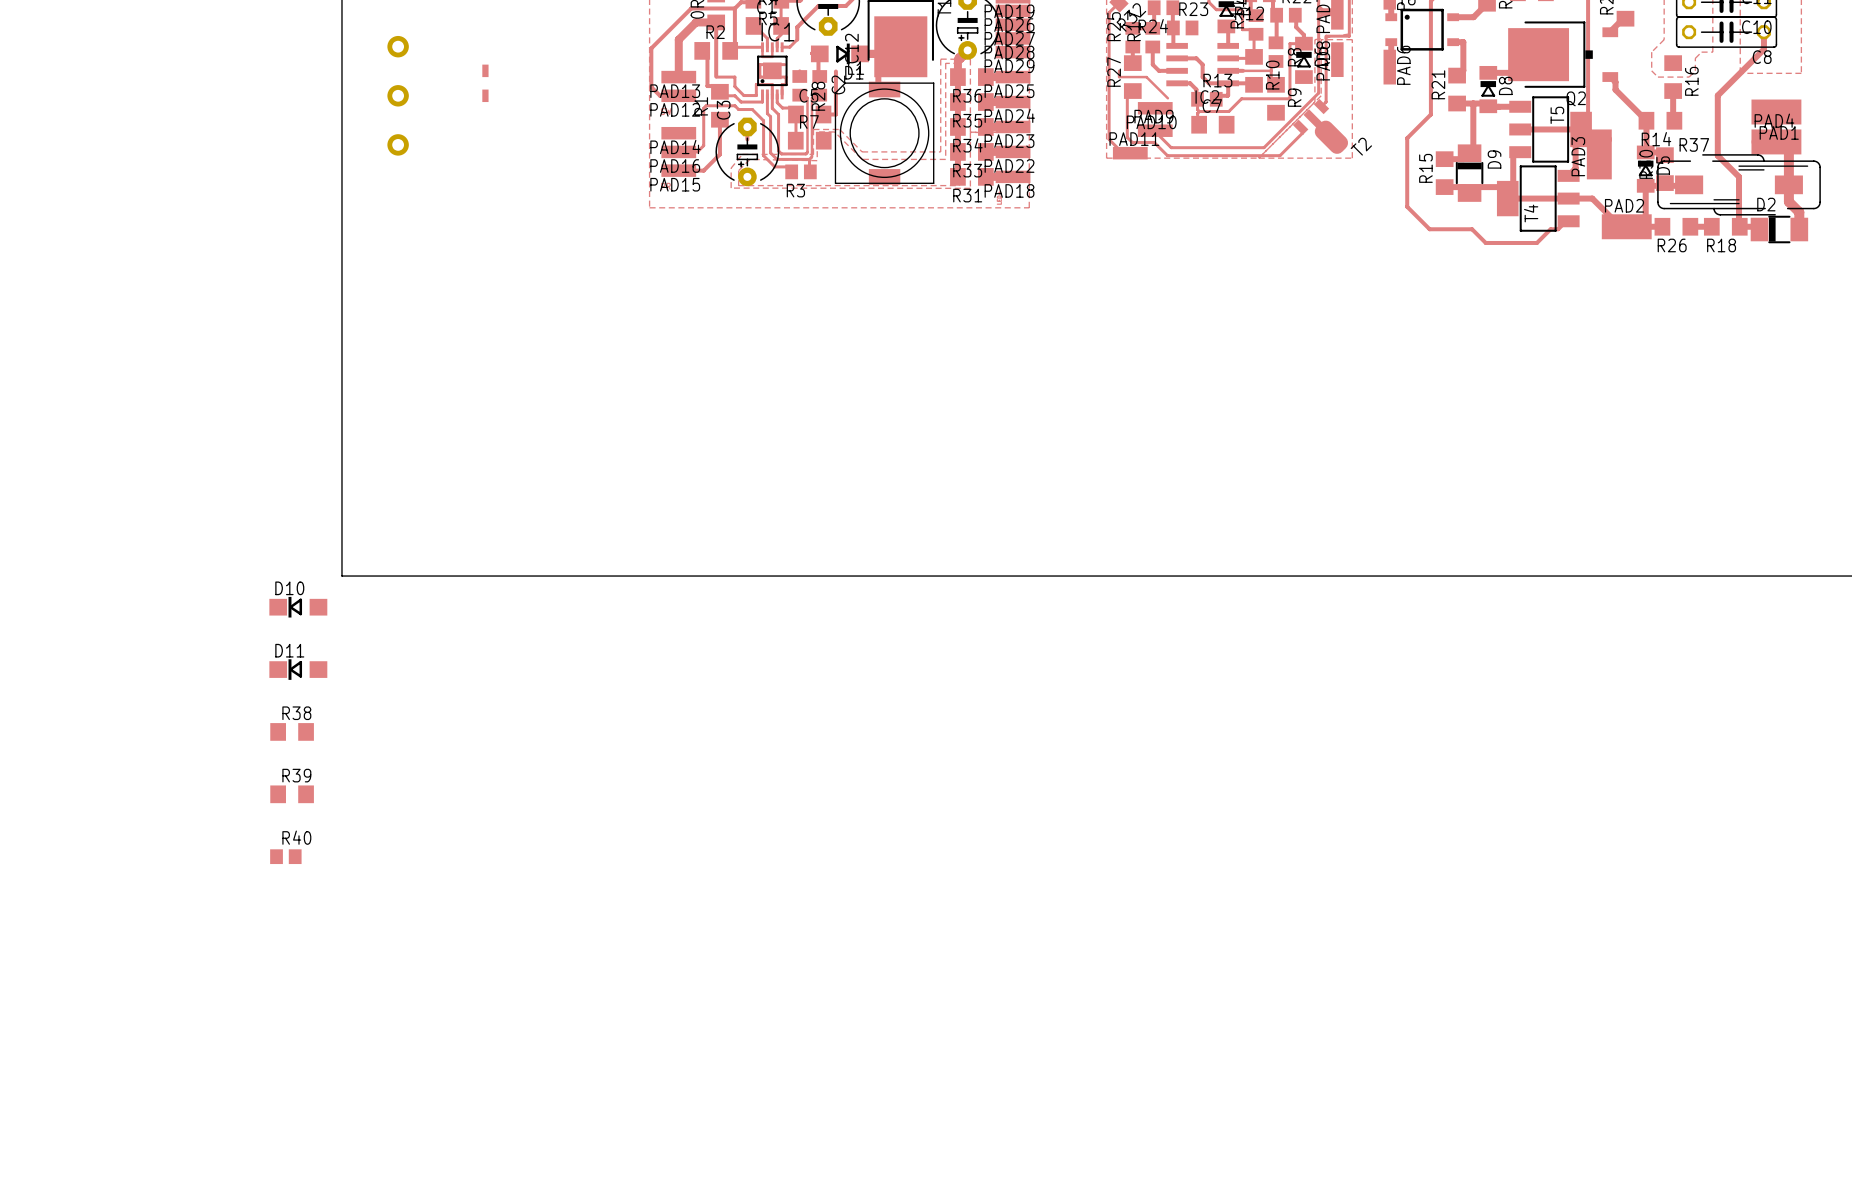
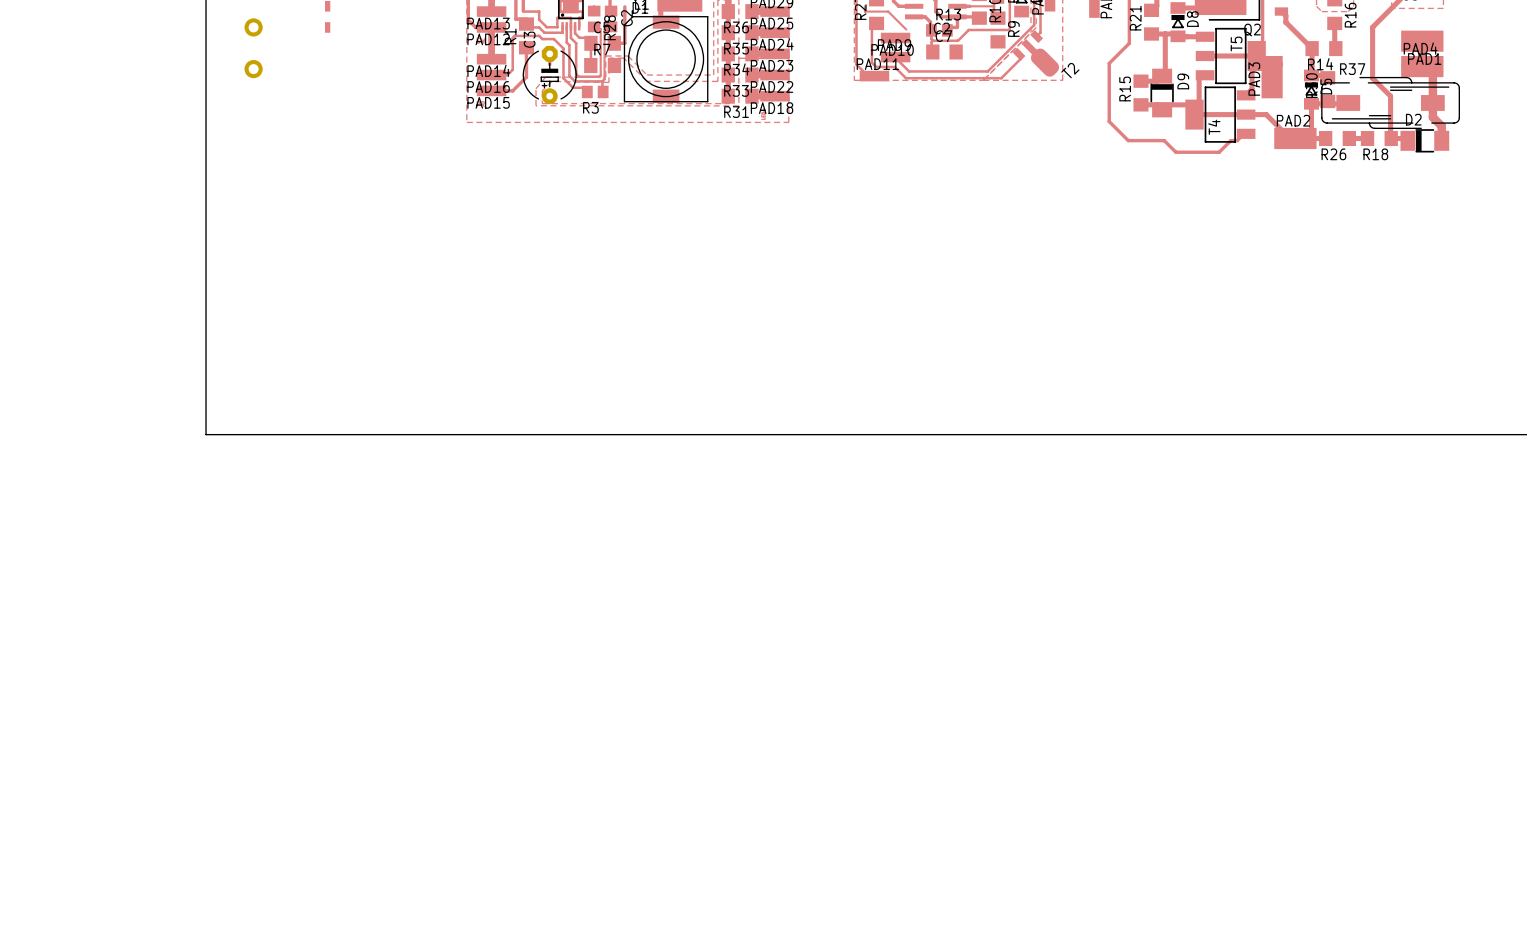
top track: none -> (491, 27) (491, 59)
D10: (298, 607) -> none
D11: (298, 669) -> none
R38: (292, 731) -> none
R39: (292, 794) -> none
R40: (285, 856) -> none

